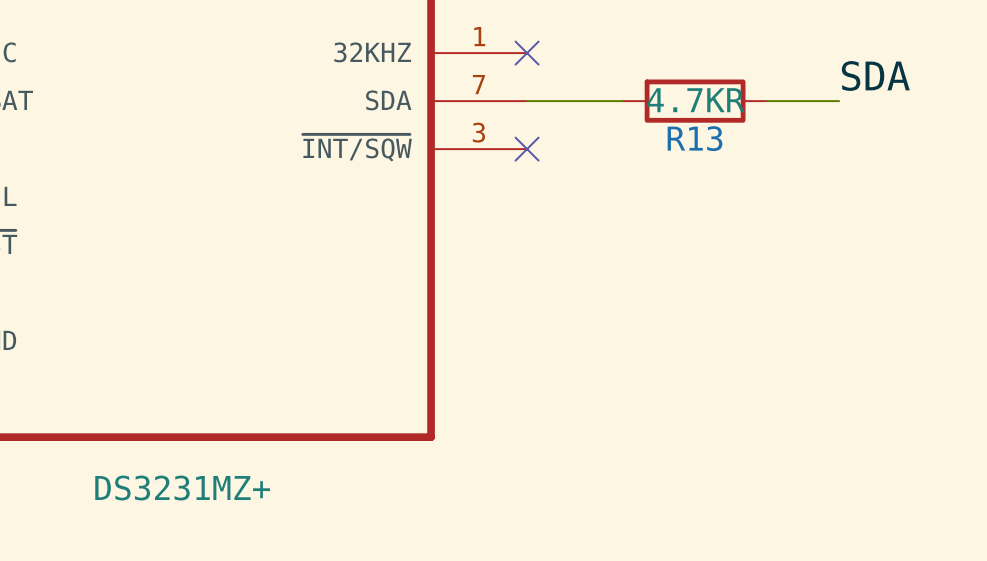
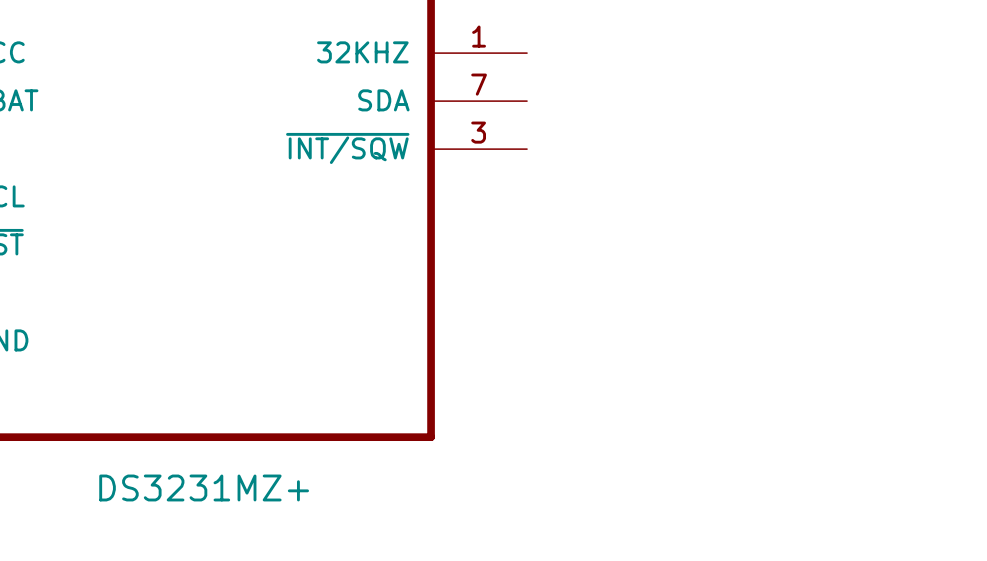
no-connect mark: (527, 53) -> none
label: SDA (875, 75) -> none
wire: (527, 101) (623, 101) -> none
R13: 4.7KR (695, 101) -> none
wire: (767, 101) (839, 101) -> none
no-connect mark: (527, 149) -> none

